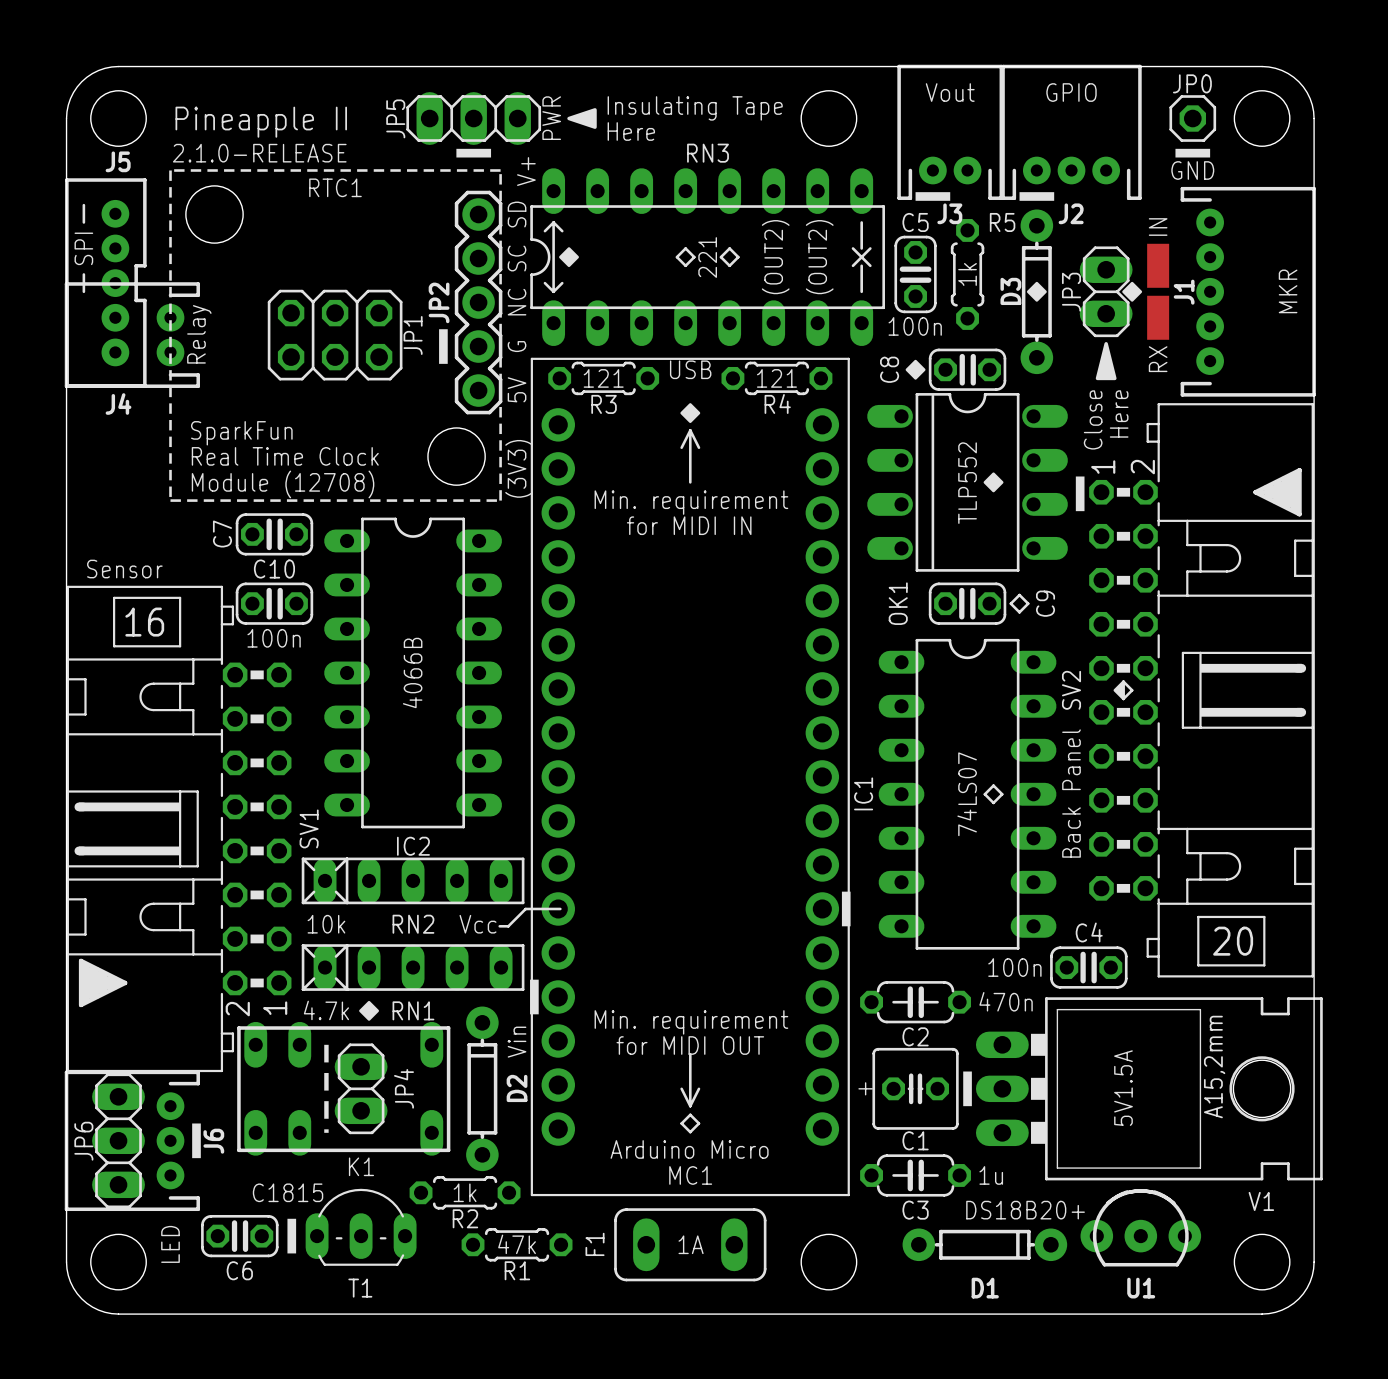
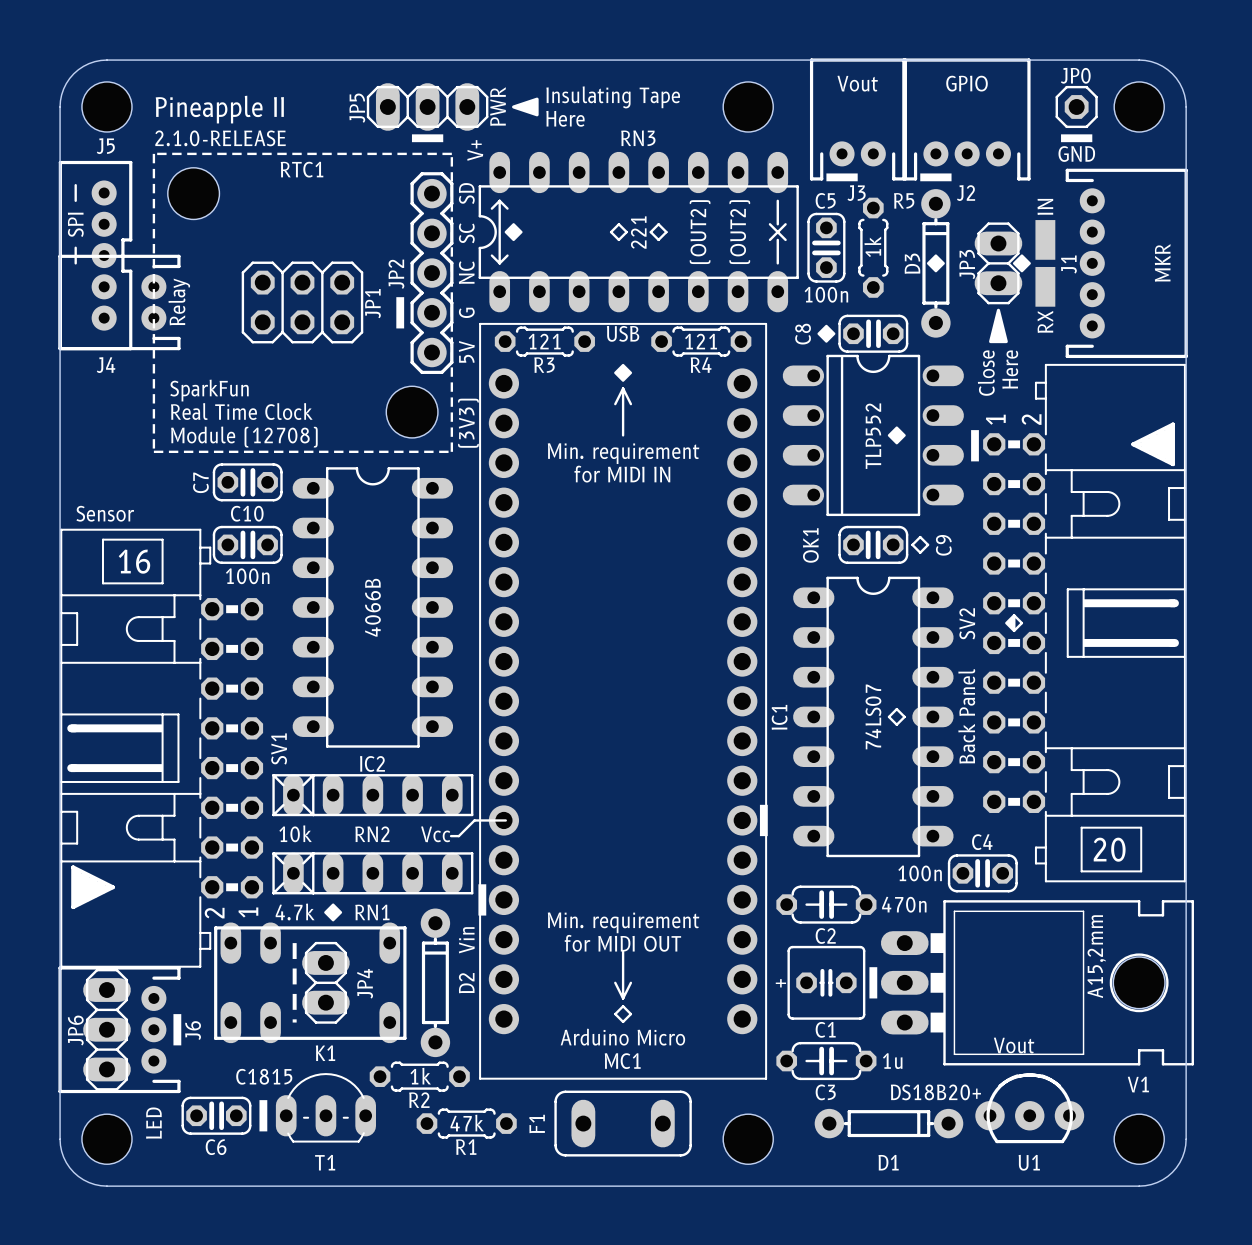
text: 5V1.5A (1123, 1088) -> none
text: none -> Vout (1014, 1045)
text: 1A (691, 1244) -> none

